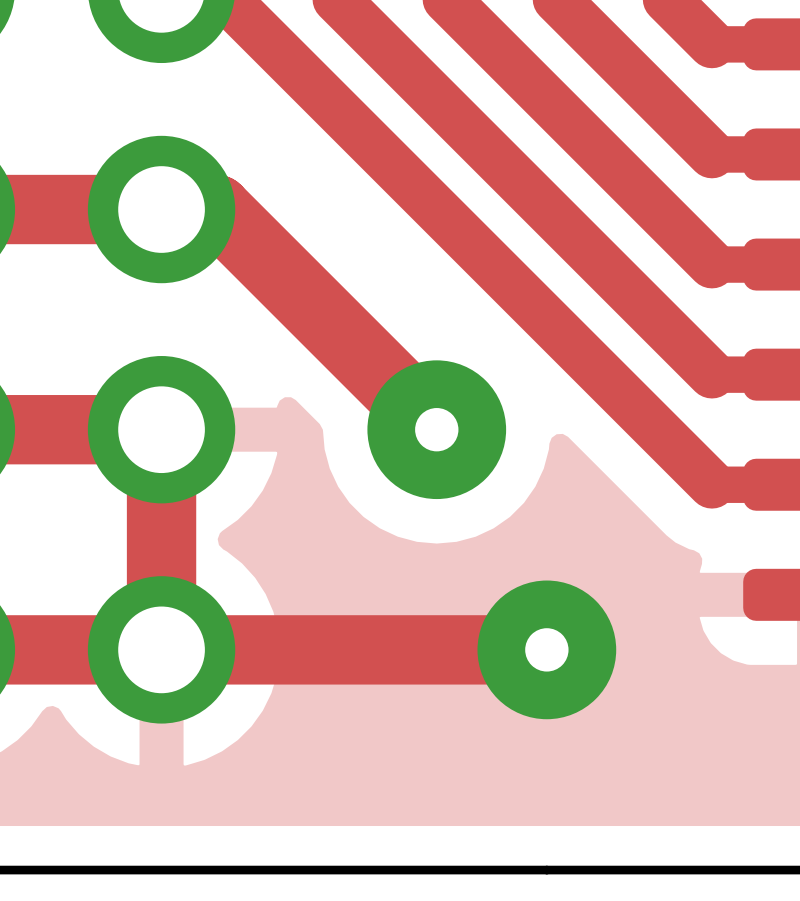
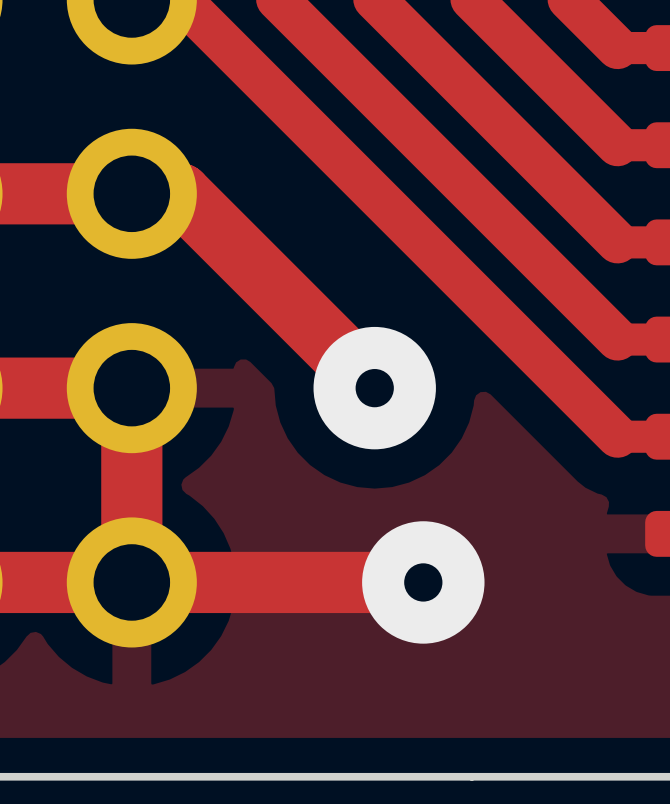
via position: (546, 649) -> (423, 582)

